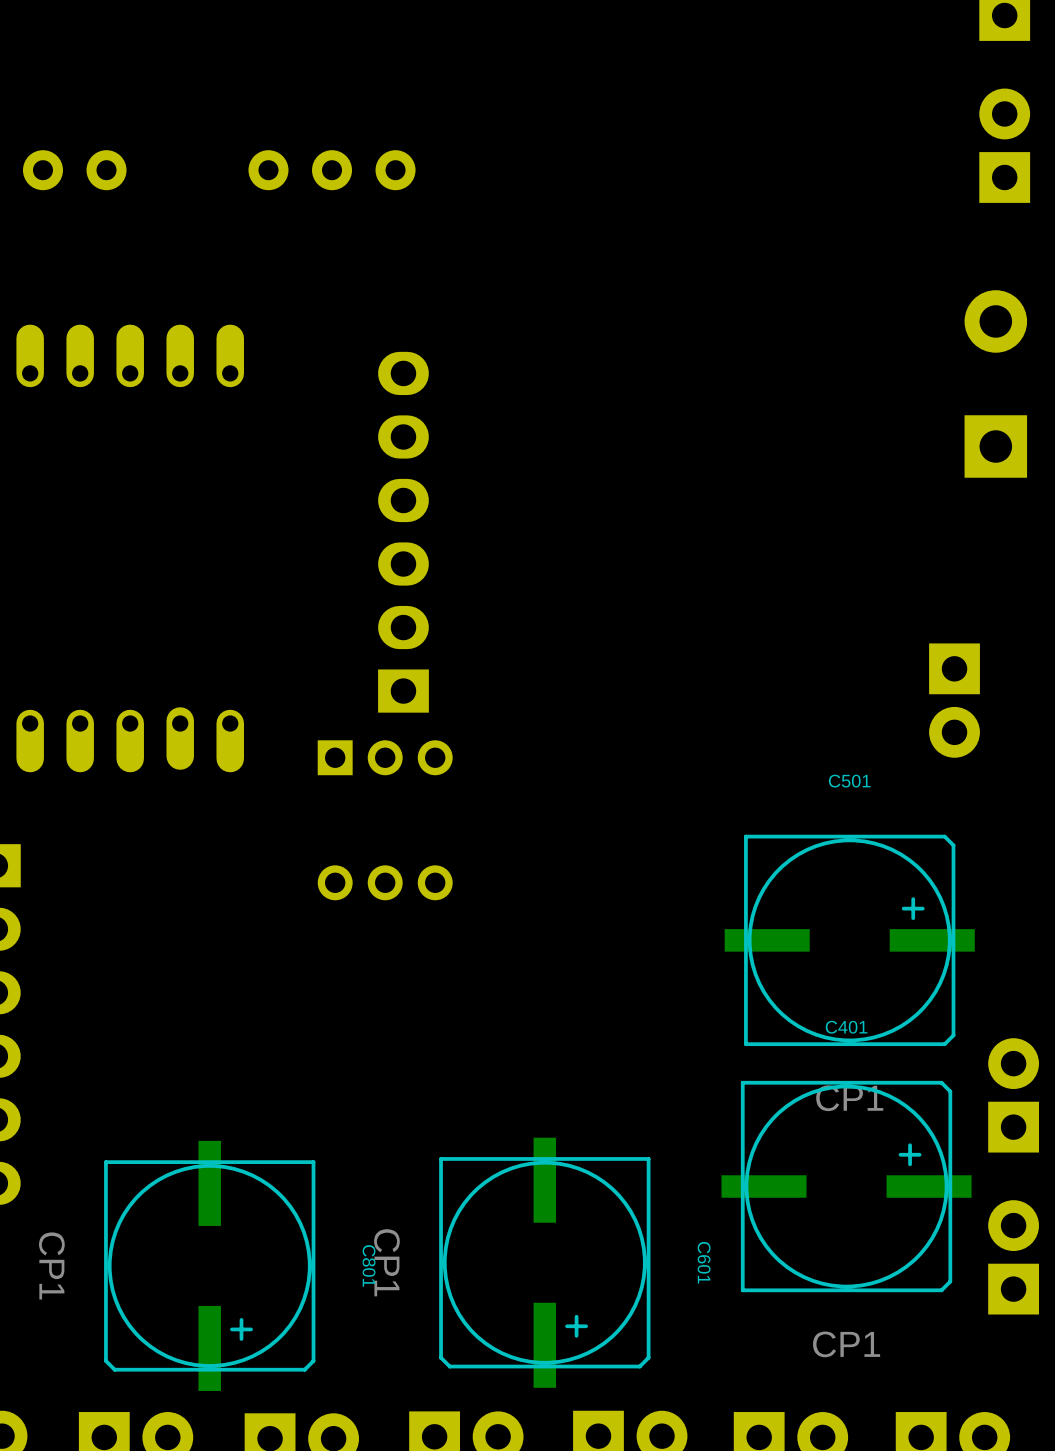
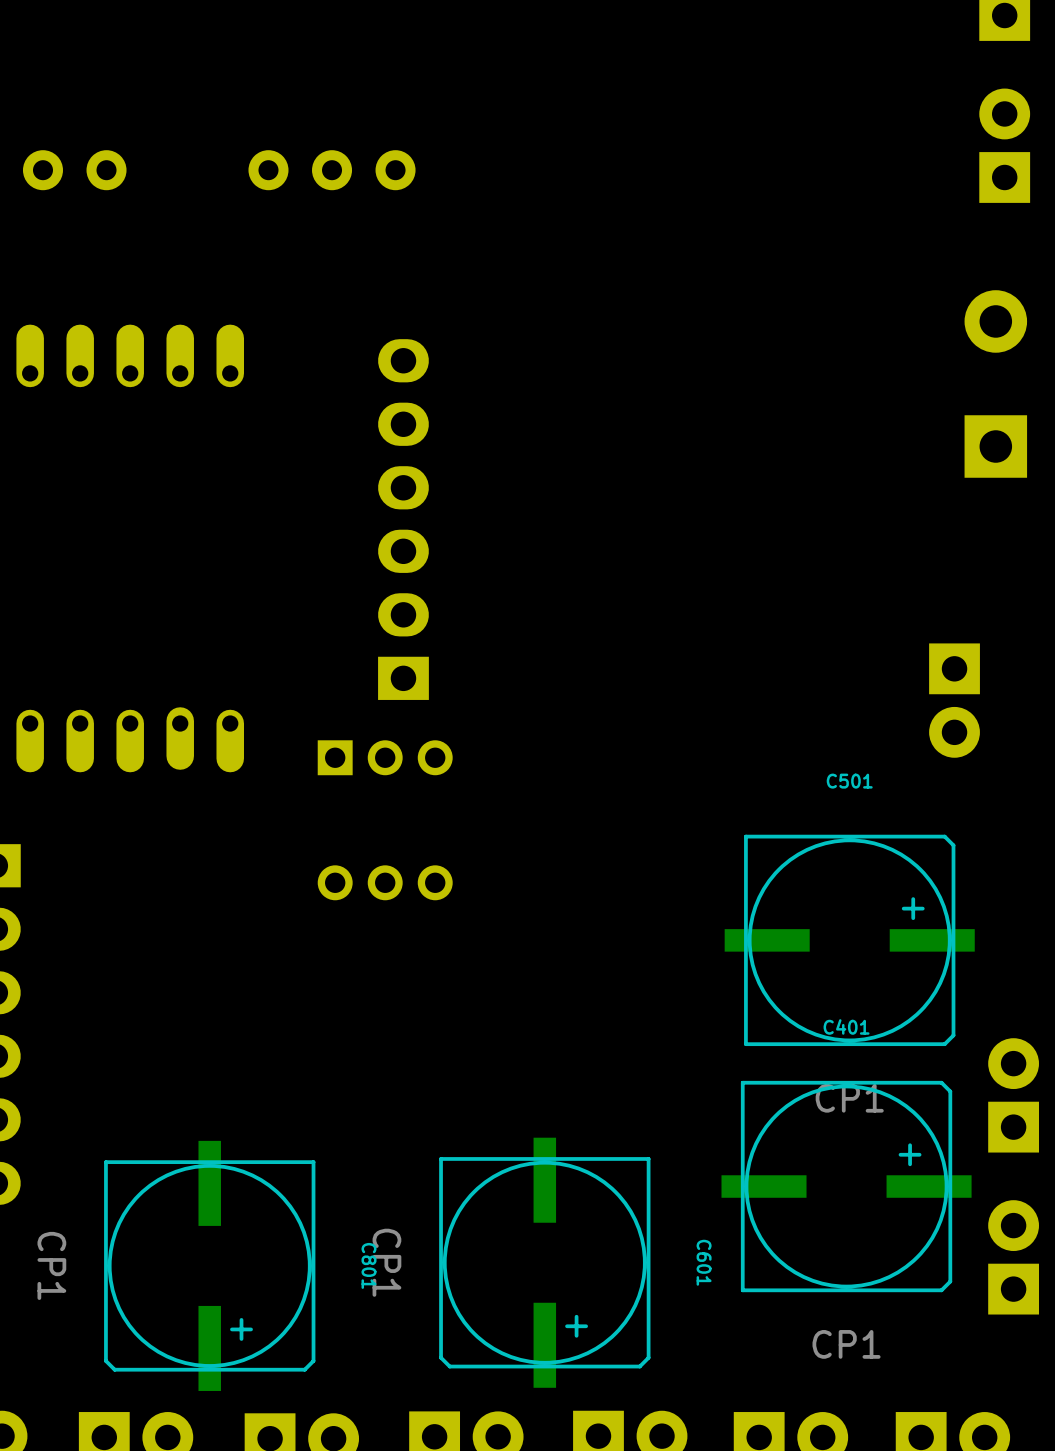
part position: (403, 532) -> (403, 519)

